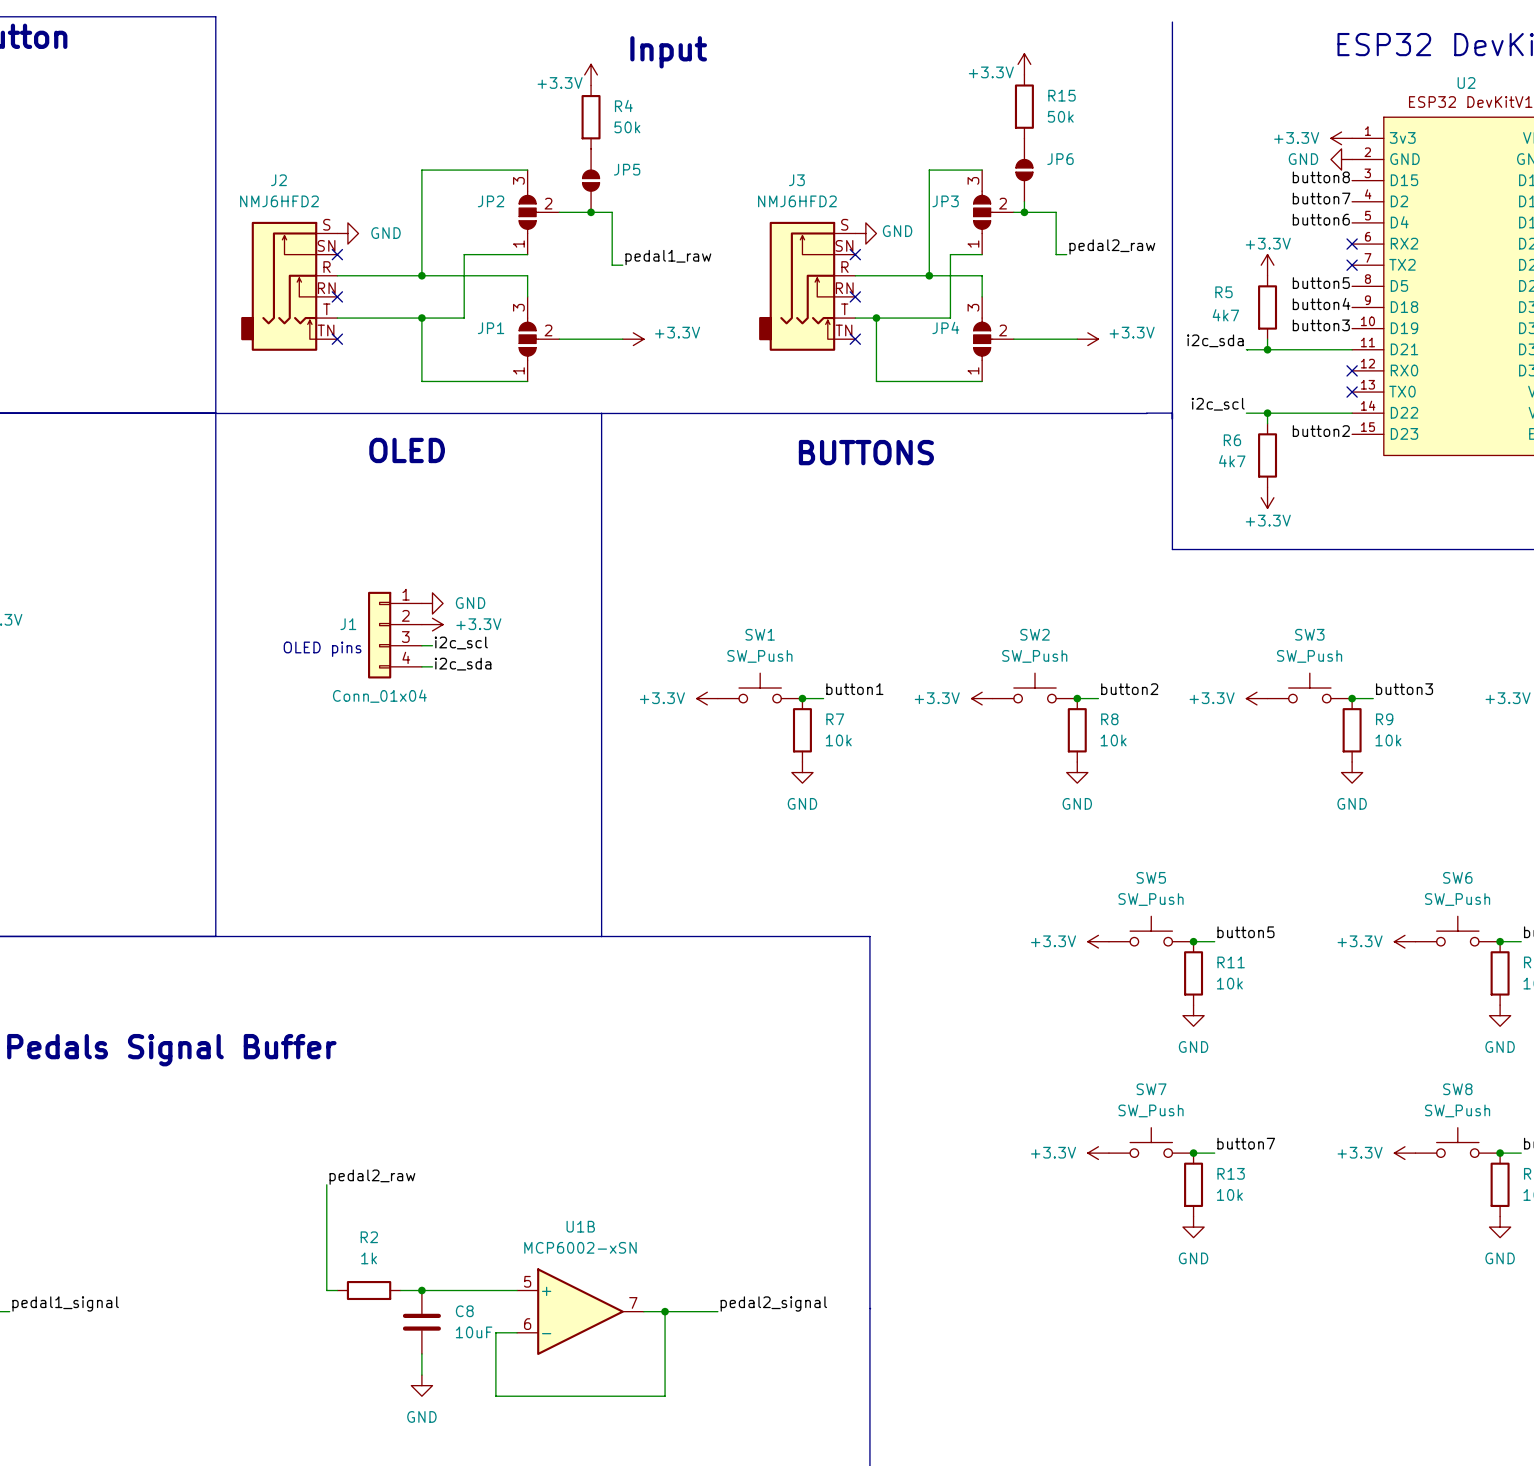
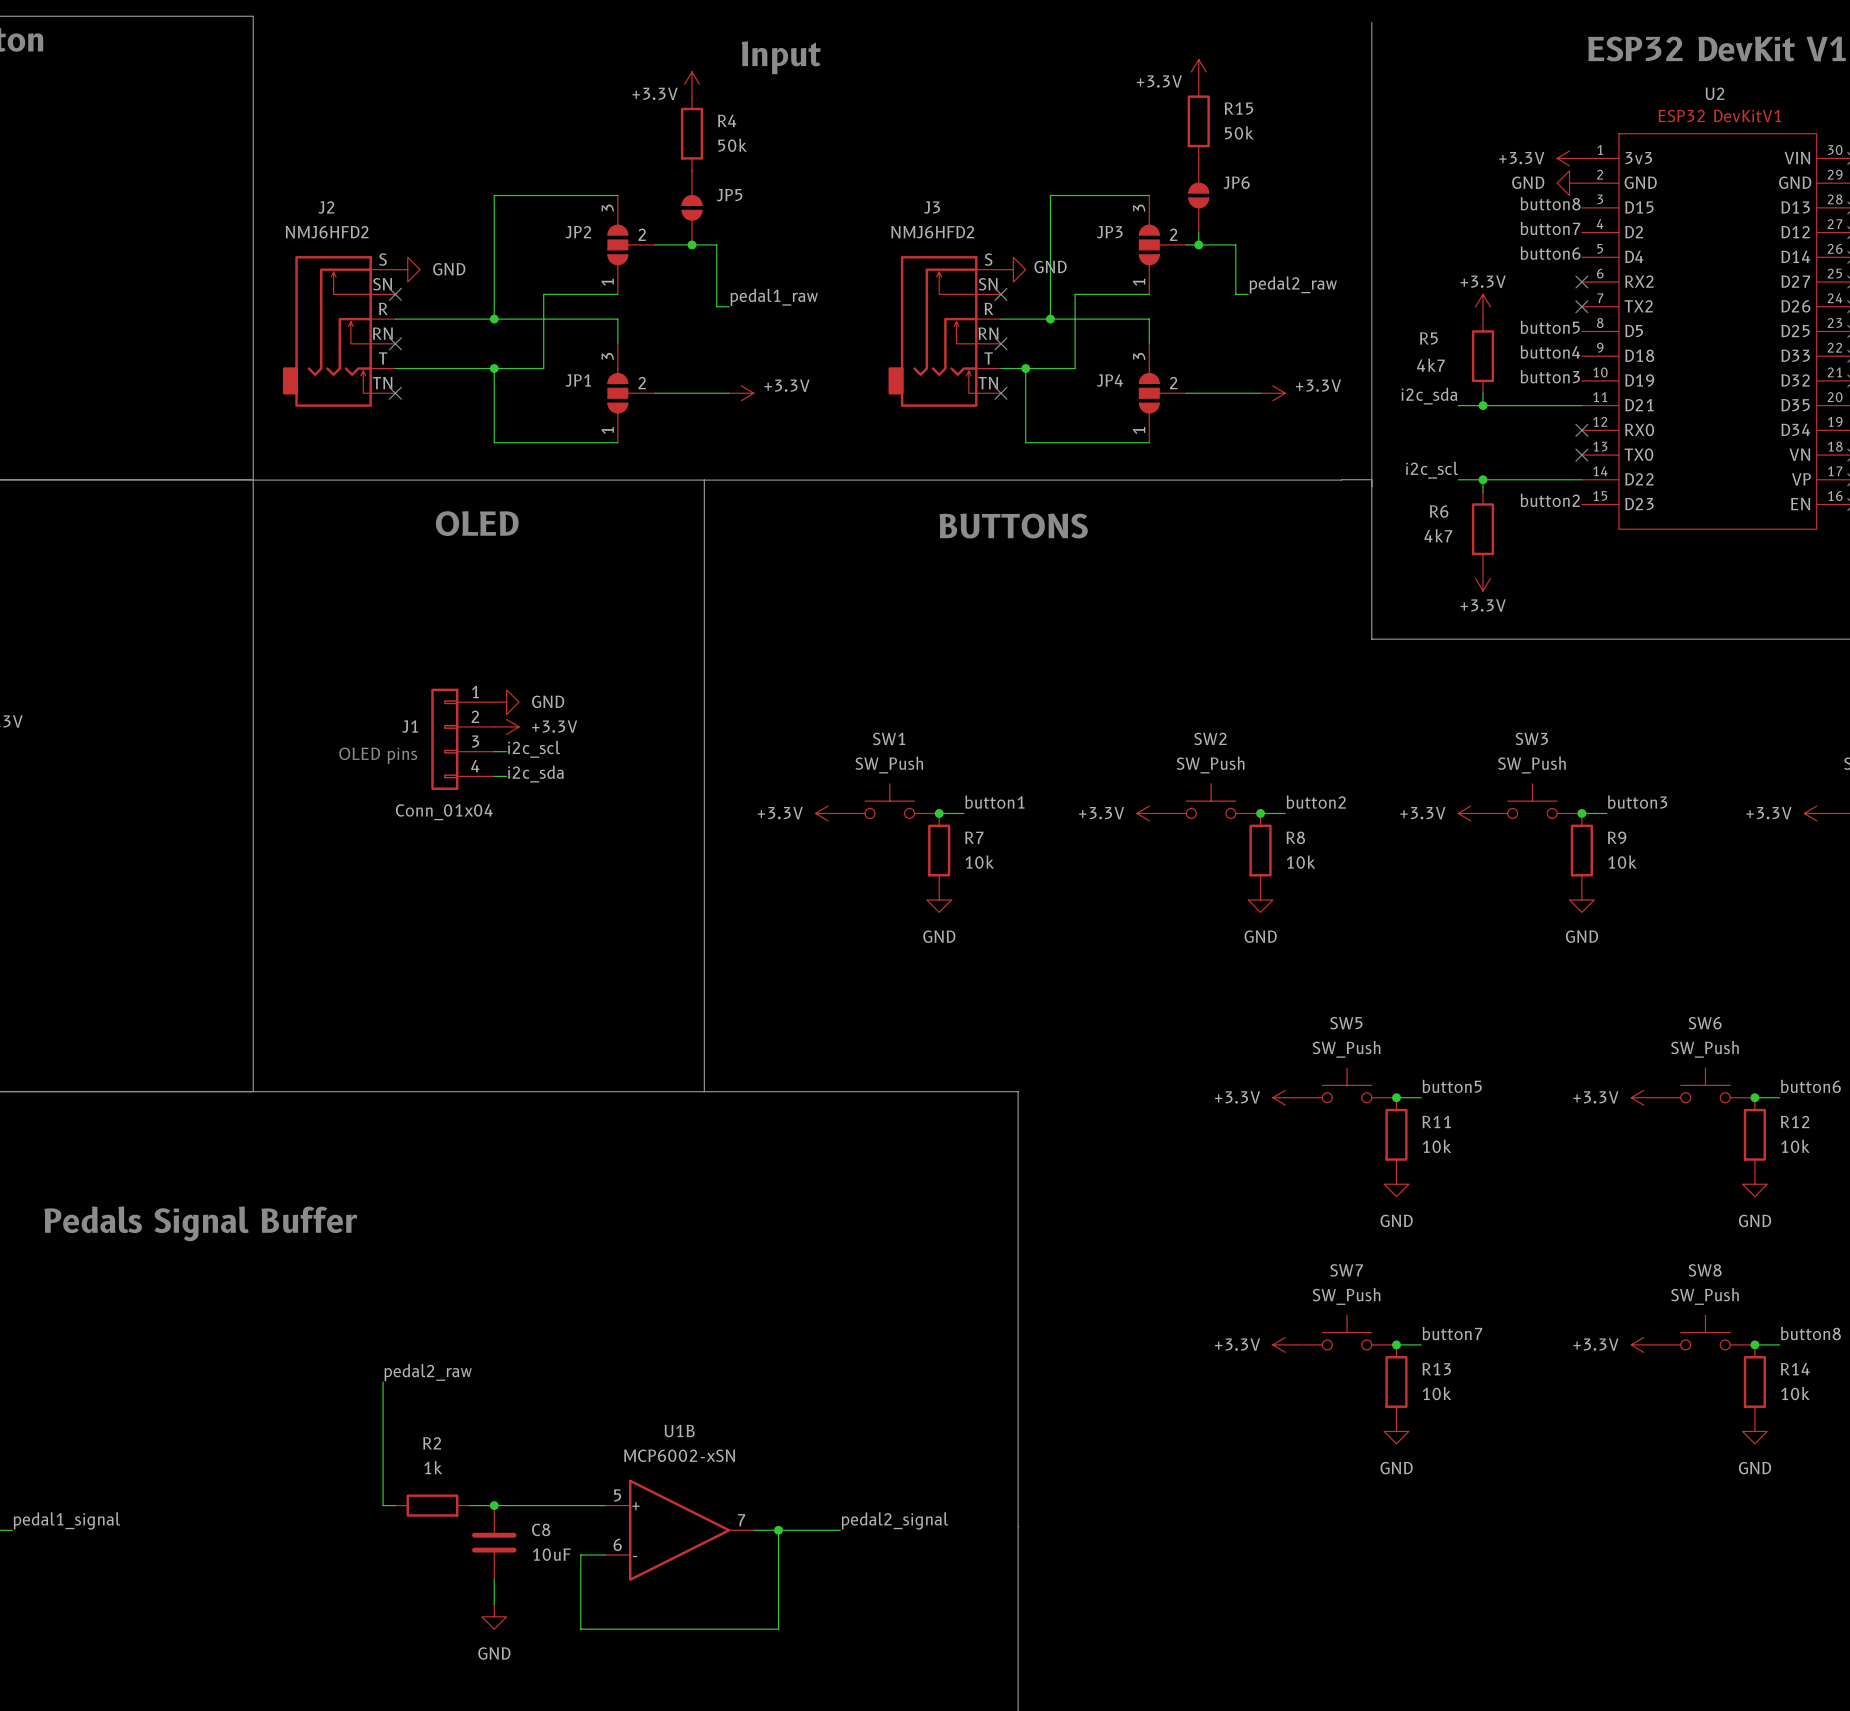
wire: (929, 170) (929, 275) -> (1087, 195) (1050, 195) (1050, 319)
wire: (950, 254) (950, 318) (918, 318) -> (1112, 294) (1075, 294) (1075, 368)
junction position: (929, 275) -> (1050, 319)

